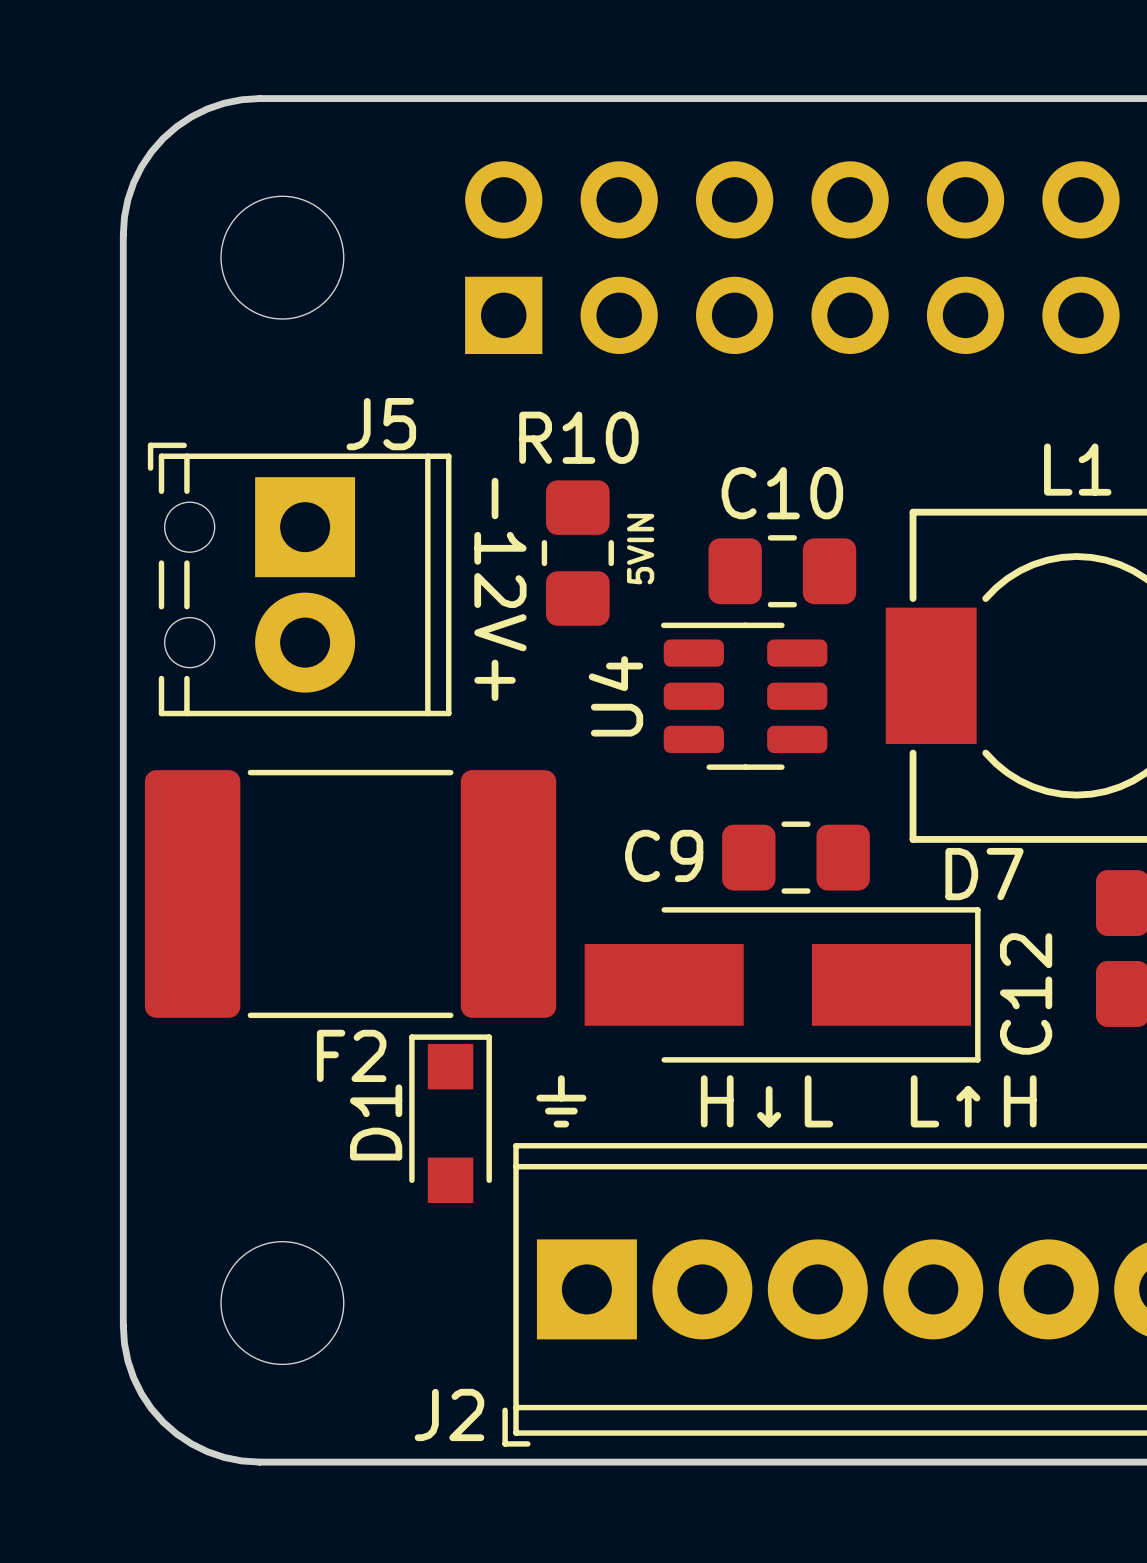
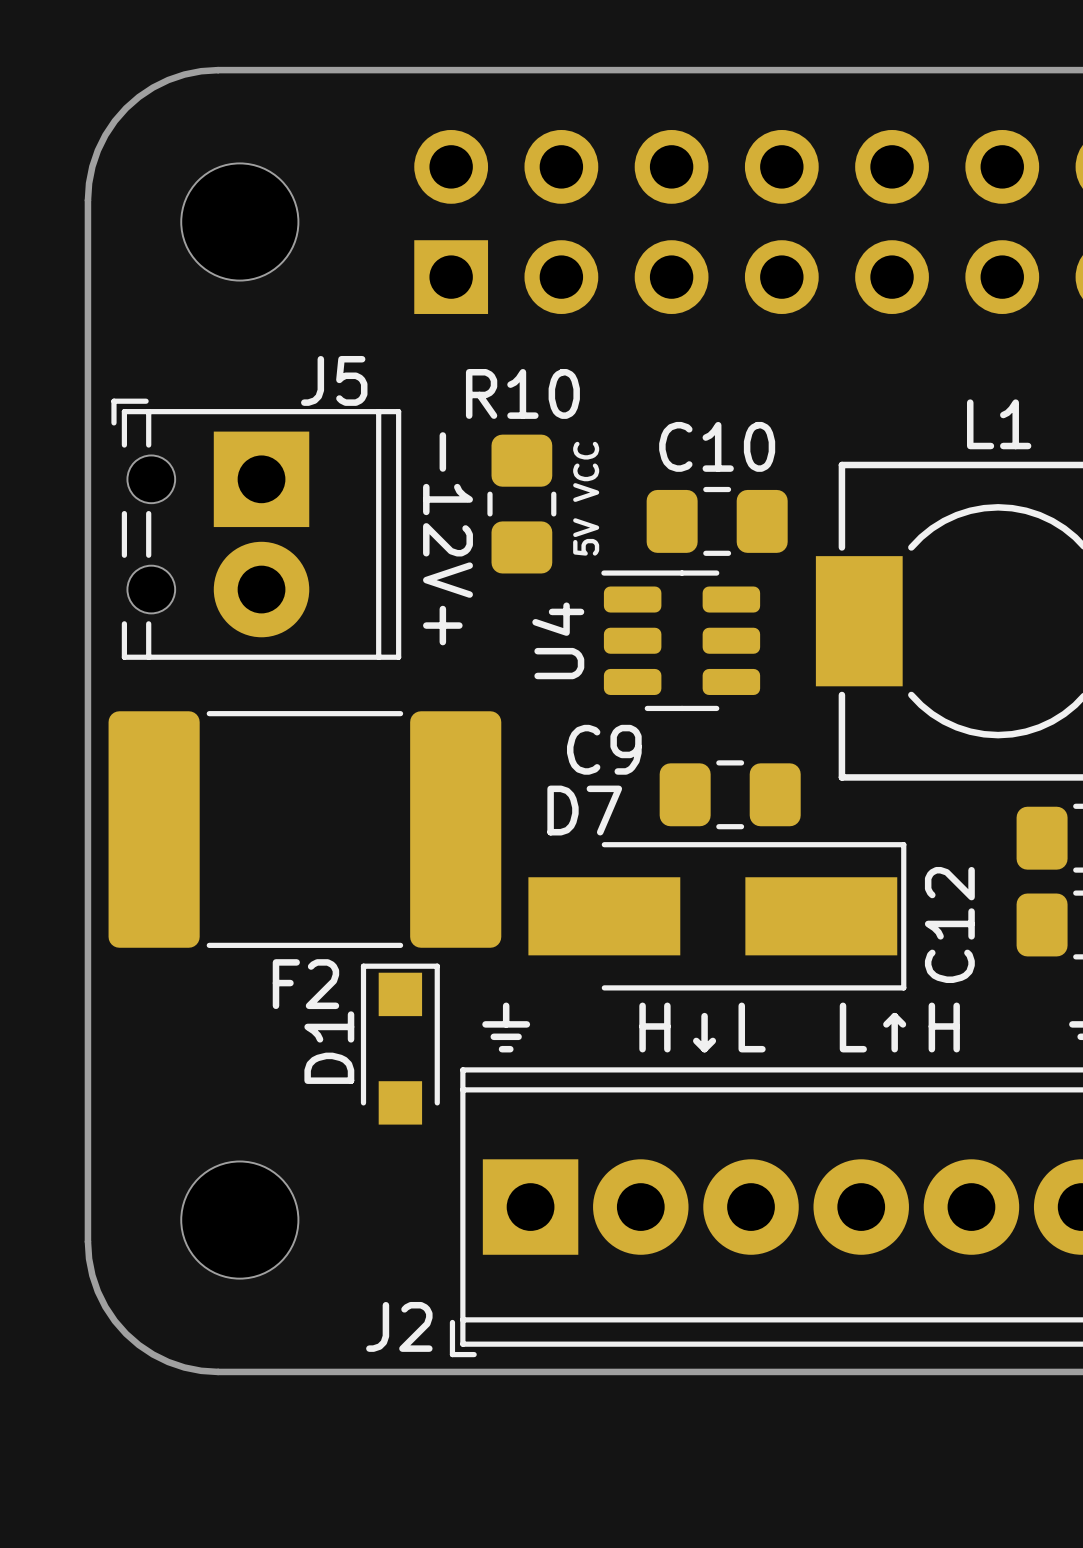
text: 5VIN (640, 549) -> 5V VCC (586, 498)
C9 name position: C9 (664, 855) -> C9 (604, 749)
D7 name position: D7 (984, 874) -> D7 (584, 810)

